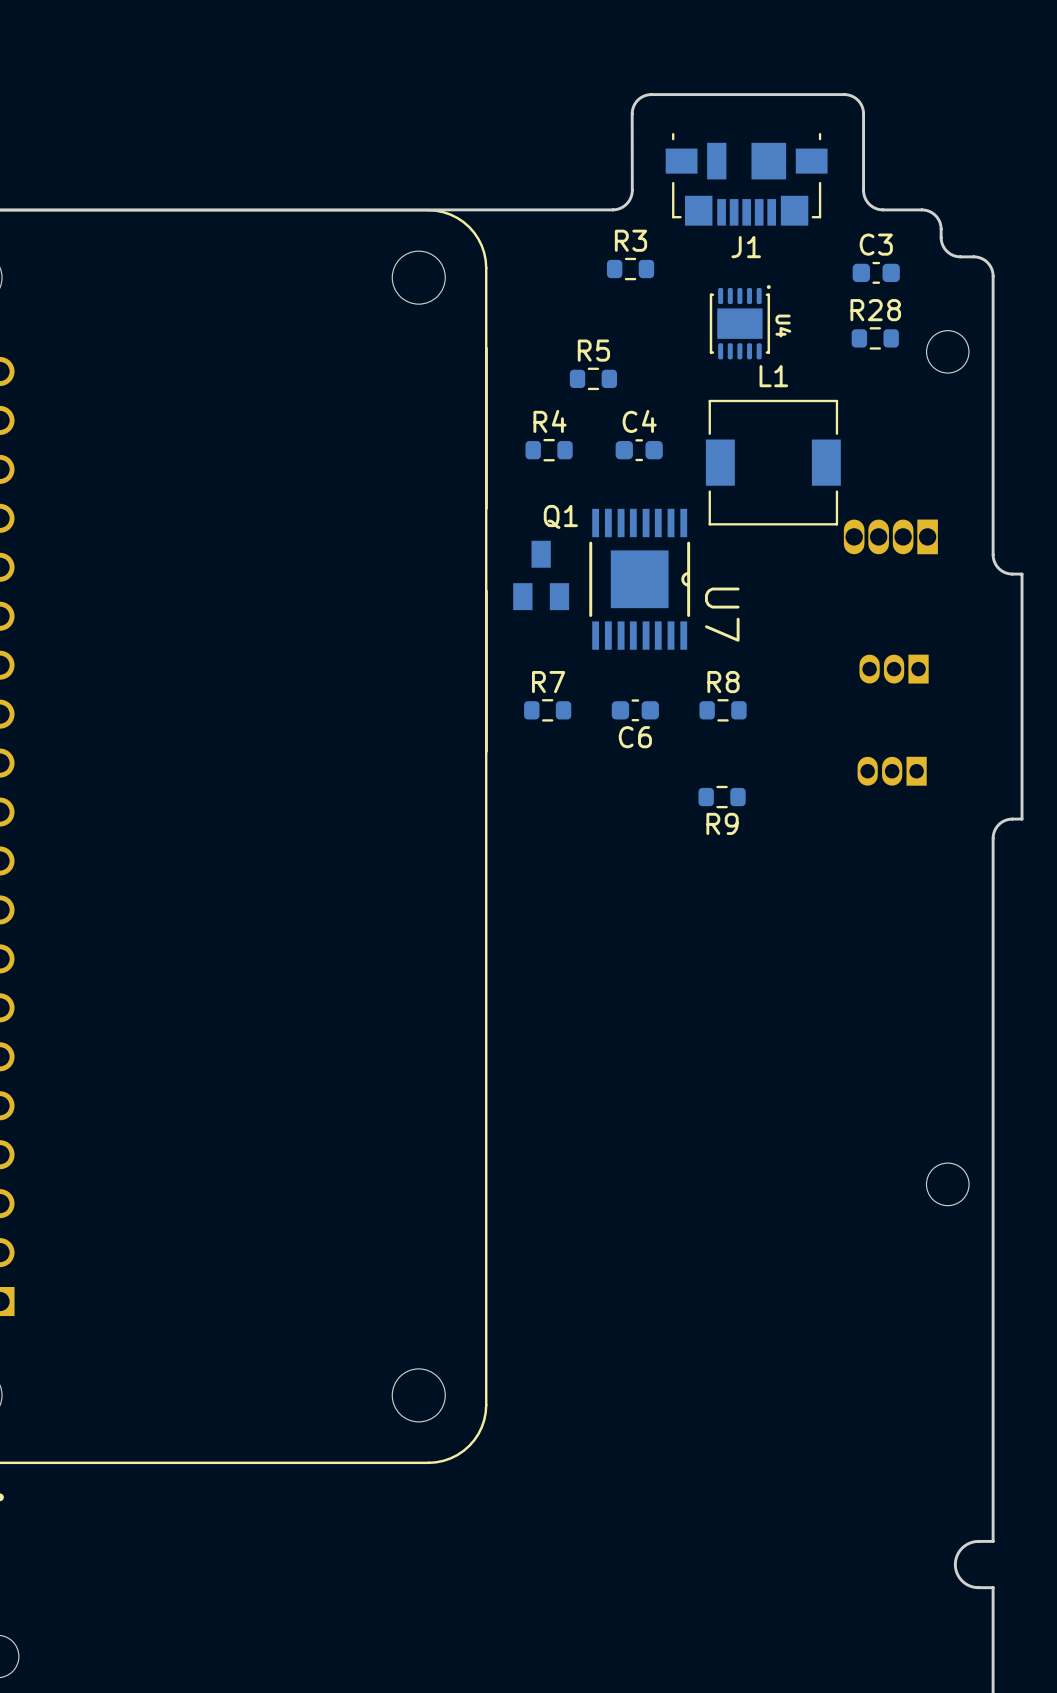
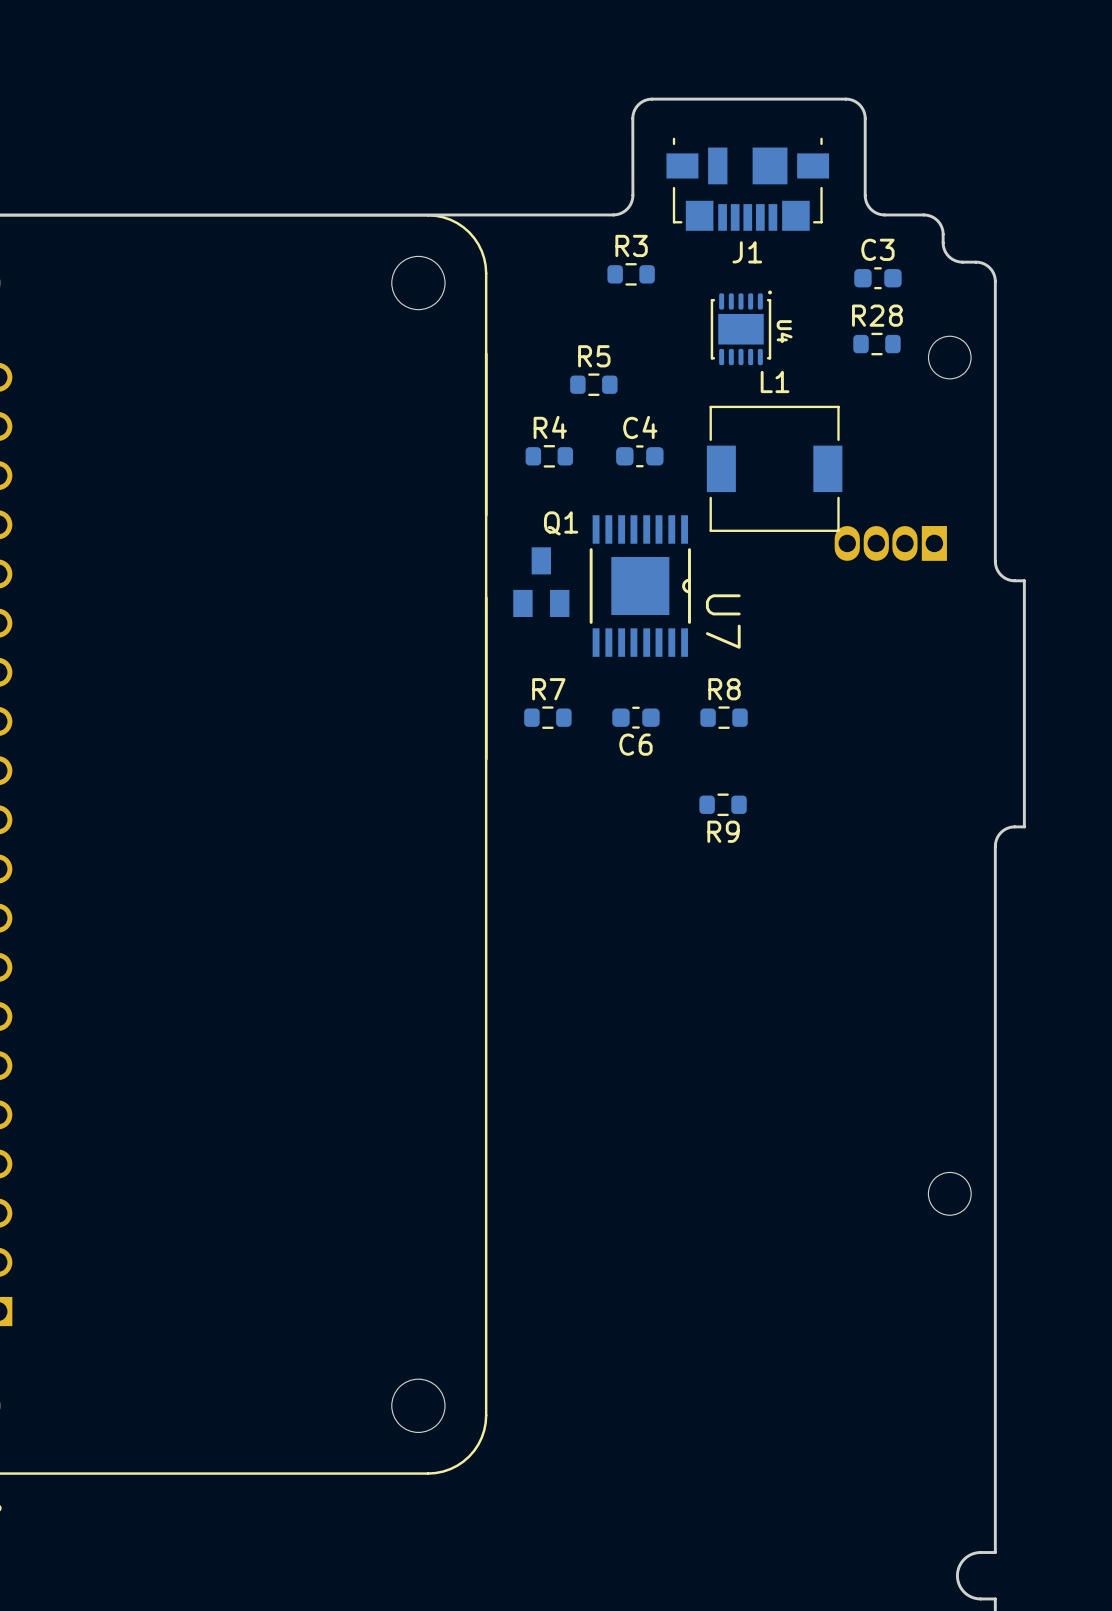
part footprint: [843, 519, 938, 555] -> [834, 526, 947, 561]
part: (894, 669) -> none
part: (892, 771) -> none

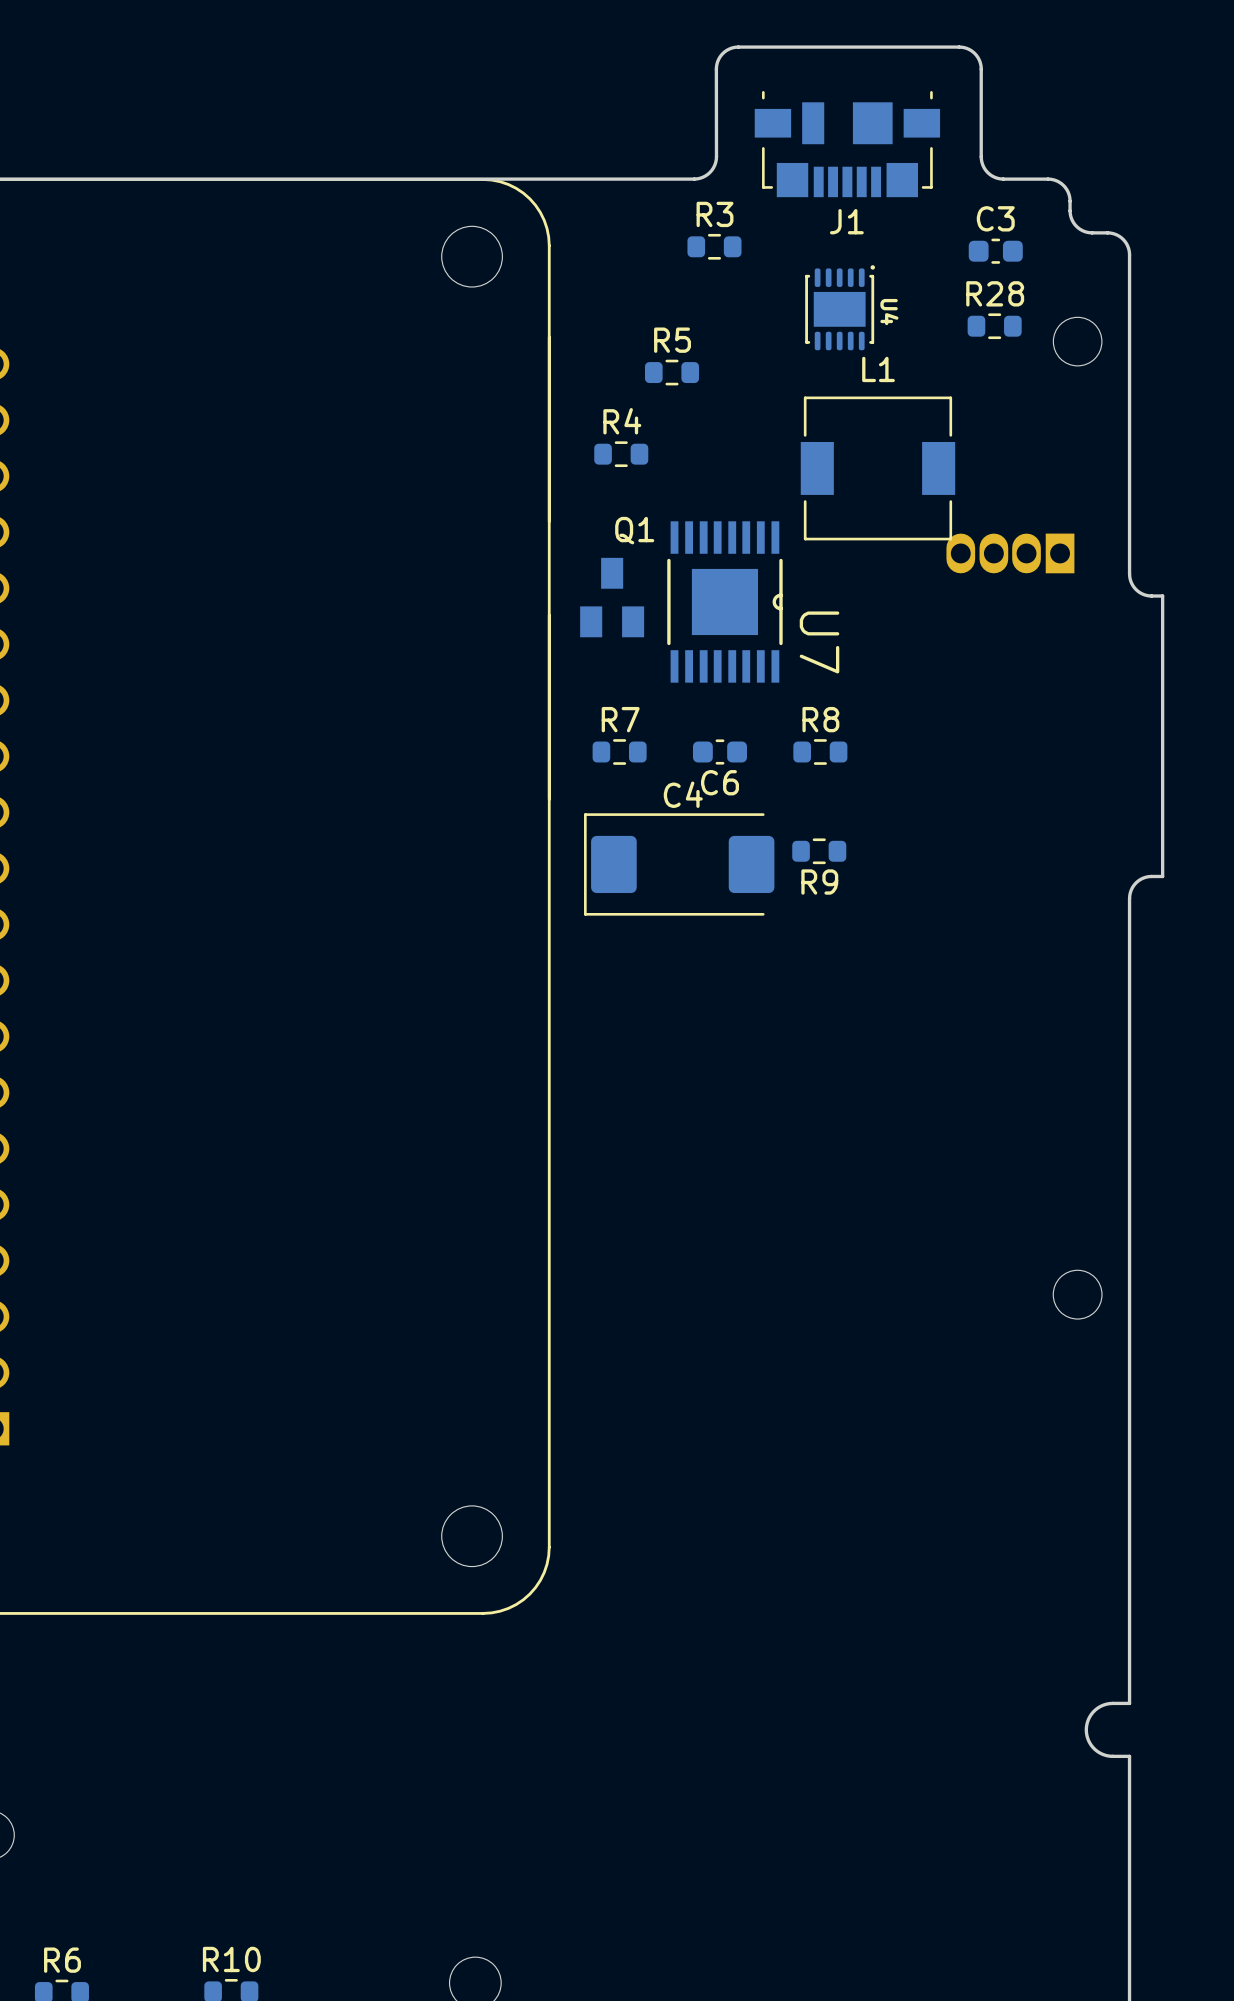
C4 footprint: [616, 445, 664, 468] -> [584, 813, 775, 916]

